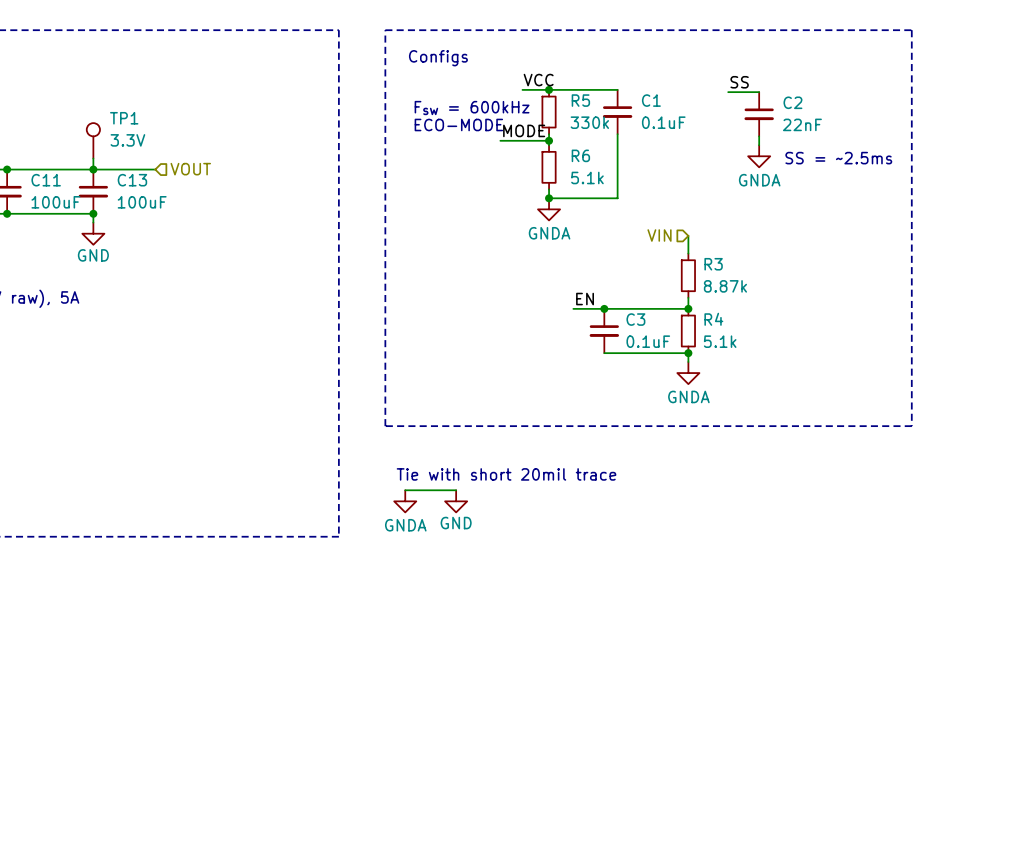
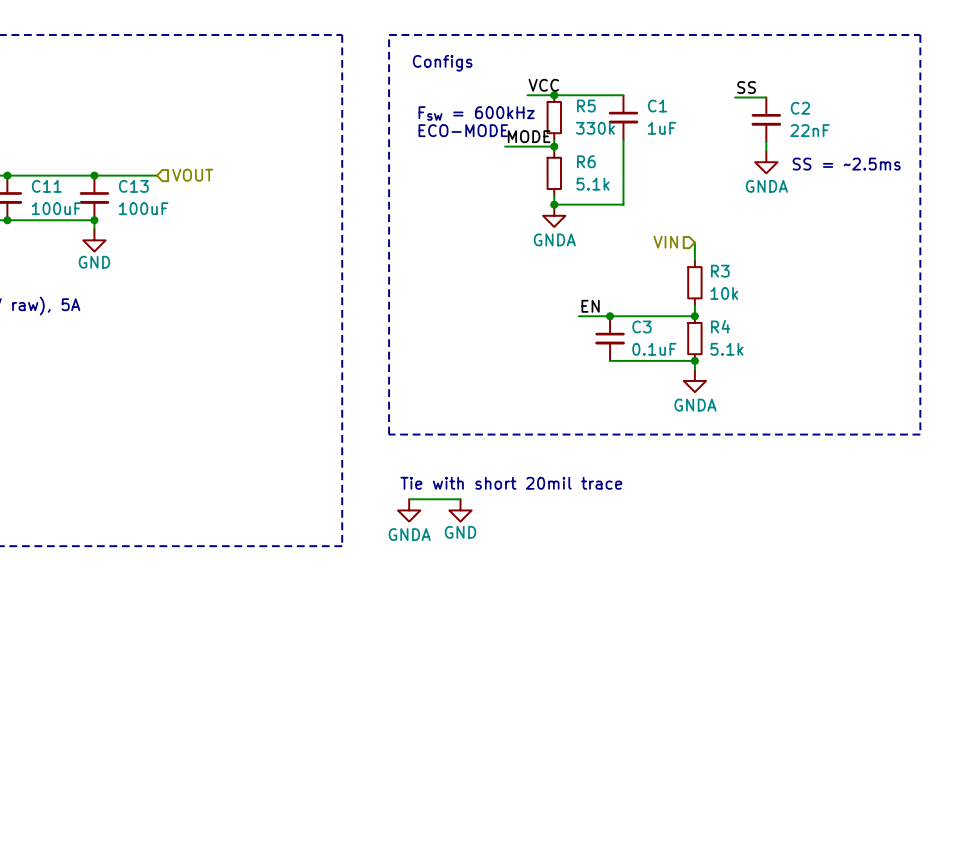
C1 value: 0.1uF (663, 122) -> 1uF (662, 128)
TP1: 3.3V (93, 140) -> none
wire: (93, 158) (93, 169) -> none
R3 value: 8.87k (725, 286) -> 10k (724, 293)

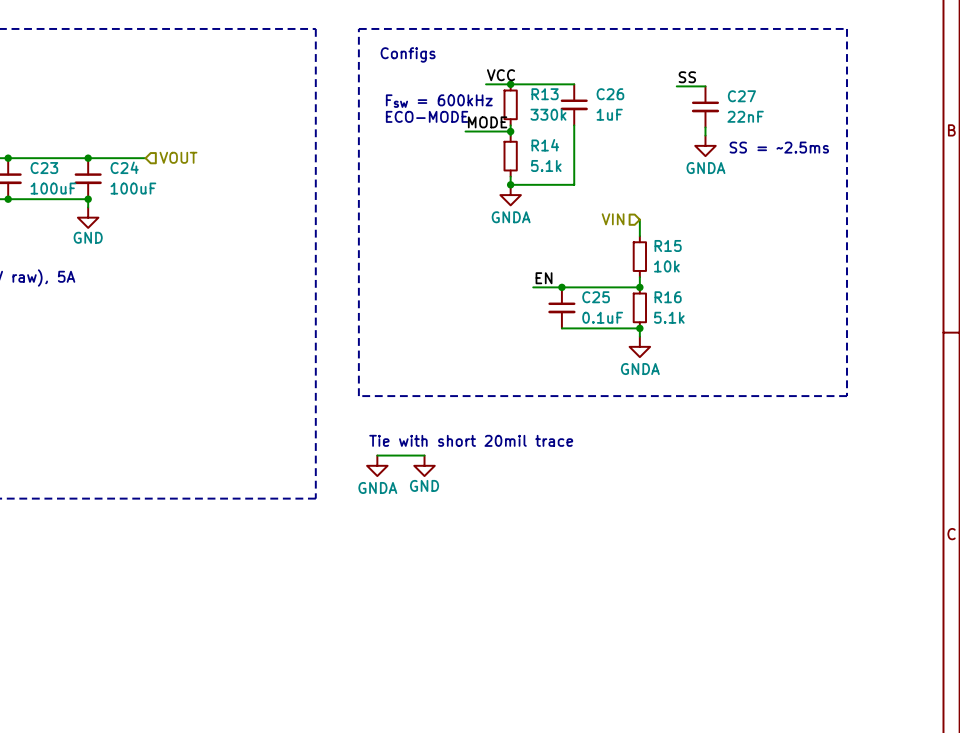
R5 name: R5 (586, 106) -> R13 (545, 94)
C1 name: C1 (657, 106) -> C26 (610, 94)
C2 name: C2 (800, 108) -> C27 (741, 96)
R6 name: R6 (586, 161) -> R14 (545, 145)
C11 name: C11 (46, 186) -> C23 (44, 168)
C13 name: C13 (133, 186) -> C24 (124, 167)
R3 name: R3 (720, 271) -> R15 (668, 245)
C3 name: C3 (641, 326) -> C25 (596, 297)
R4 name: R4 (720, 326) -> R16 (668, 297)

